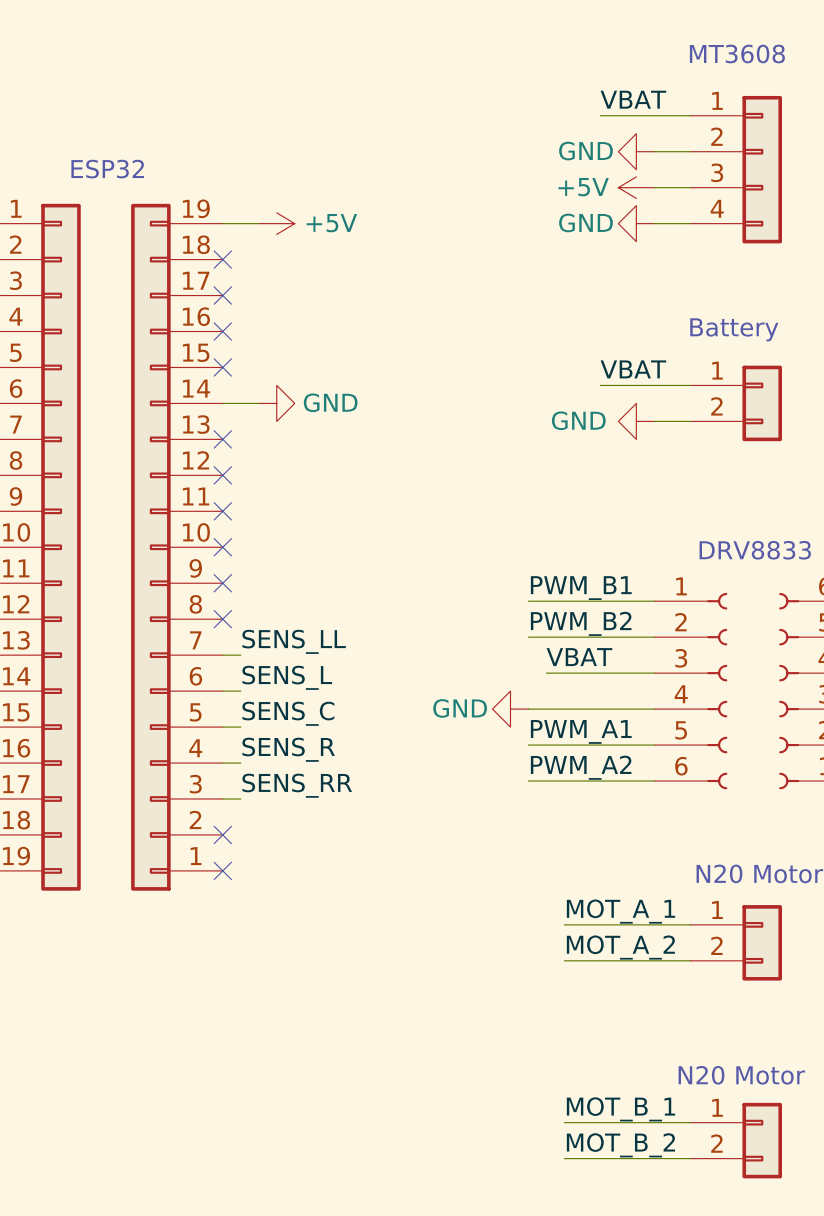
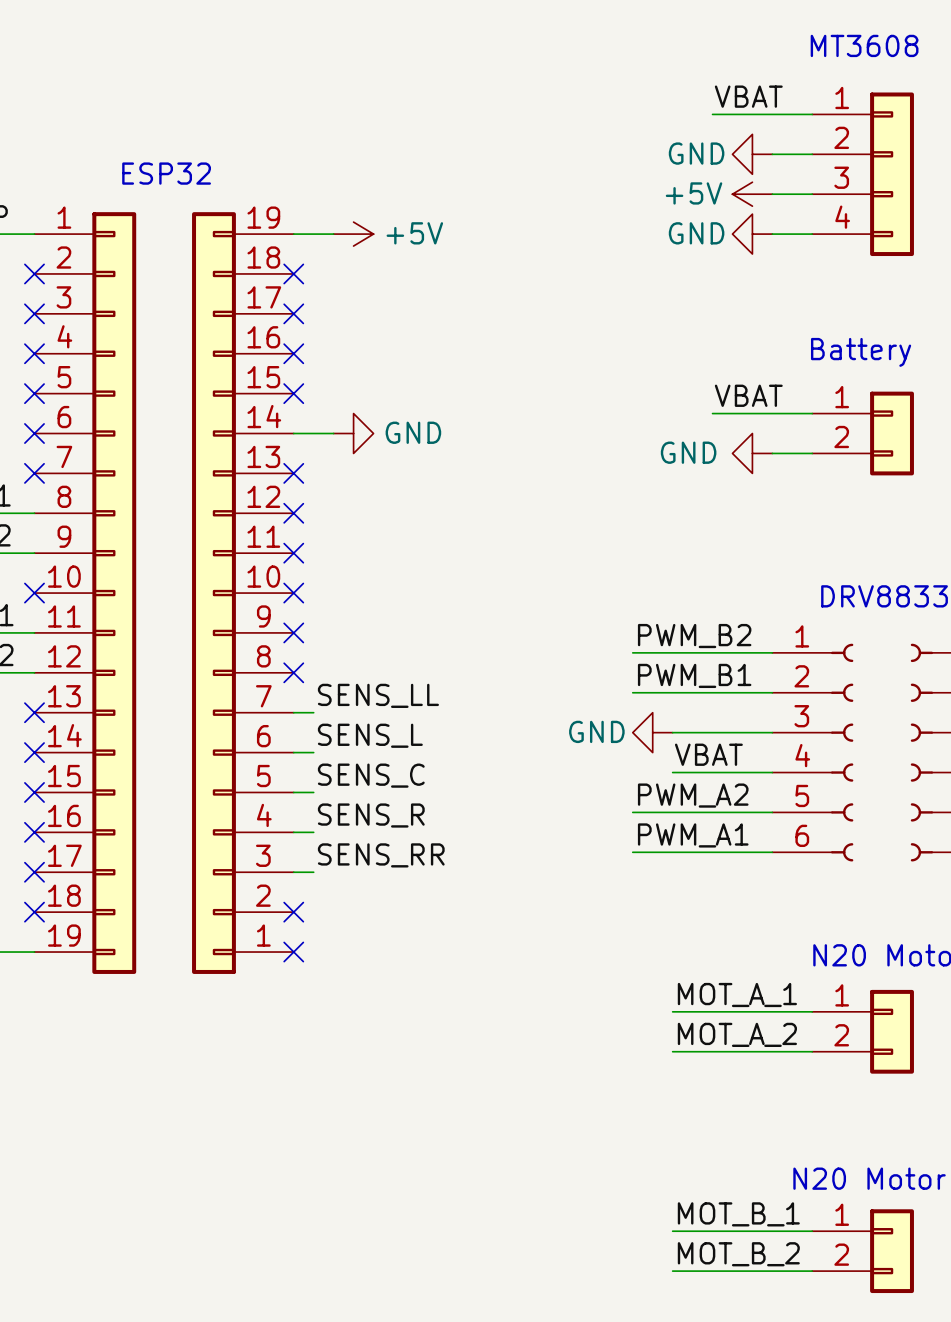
label: PWM_B1 (581, 588) -> PWM_B2 (694, 636)
label: PWM_B2 (581, 623) -> PWM_B1 (694, 675)
label position: VBAT (579, 657) -> VBAT (708, 754)
power symbol position: GND (510, 709) -> GND (652, 732)
wire: (528, 709) (564, 709) -> none
label: PWM_A1 (581, 731) -> PWM_A2 (693, 795)
label: PWM_A2 (581, 767) -> PWM_A1 (693, 835)

